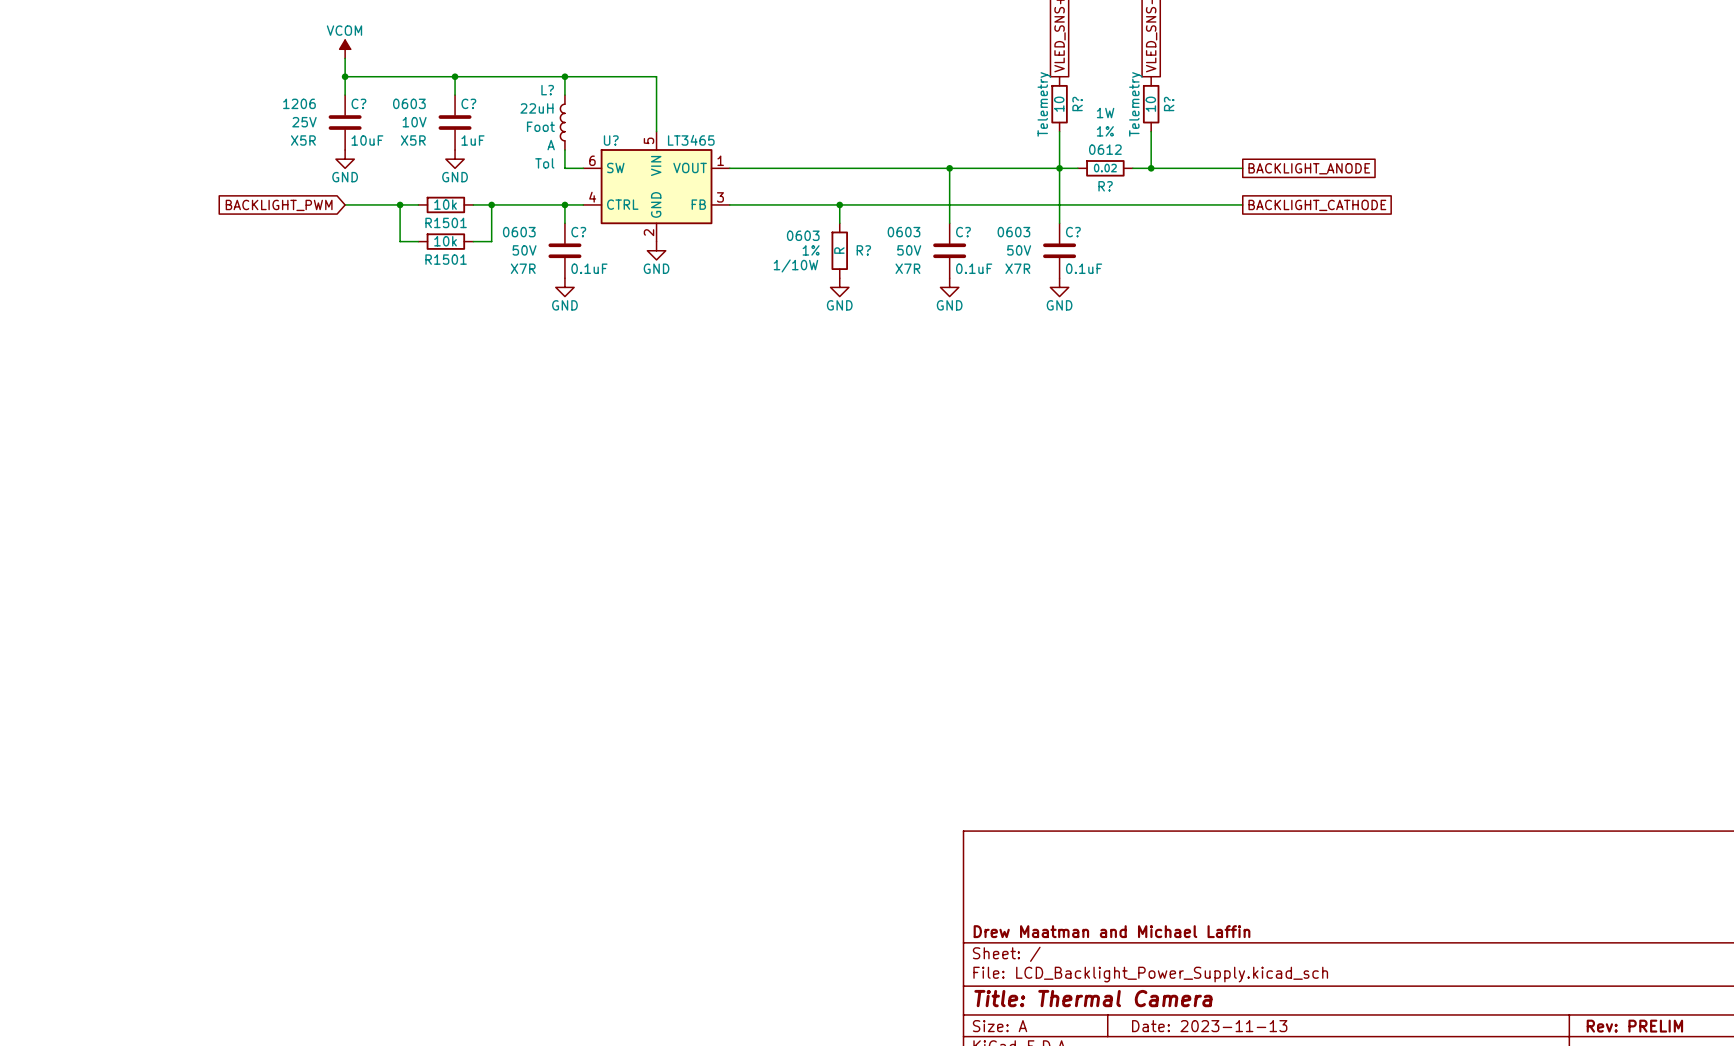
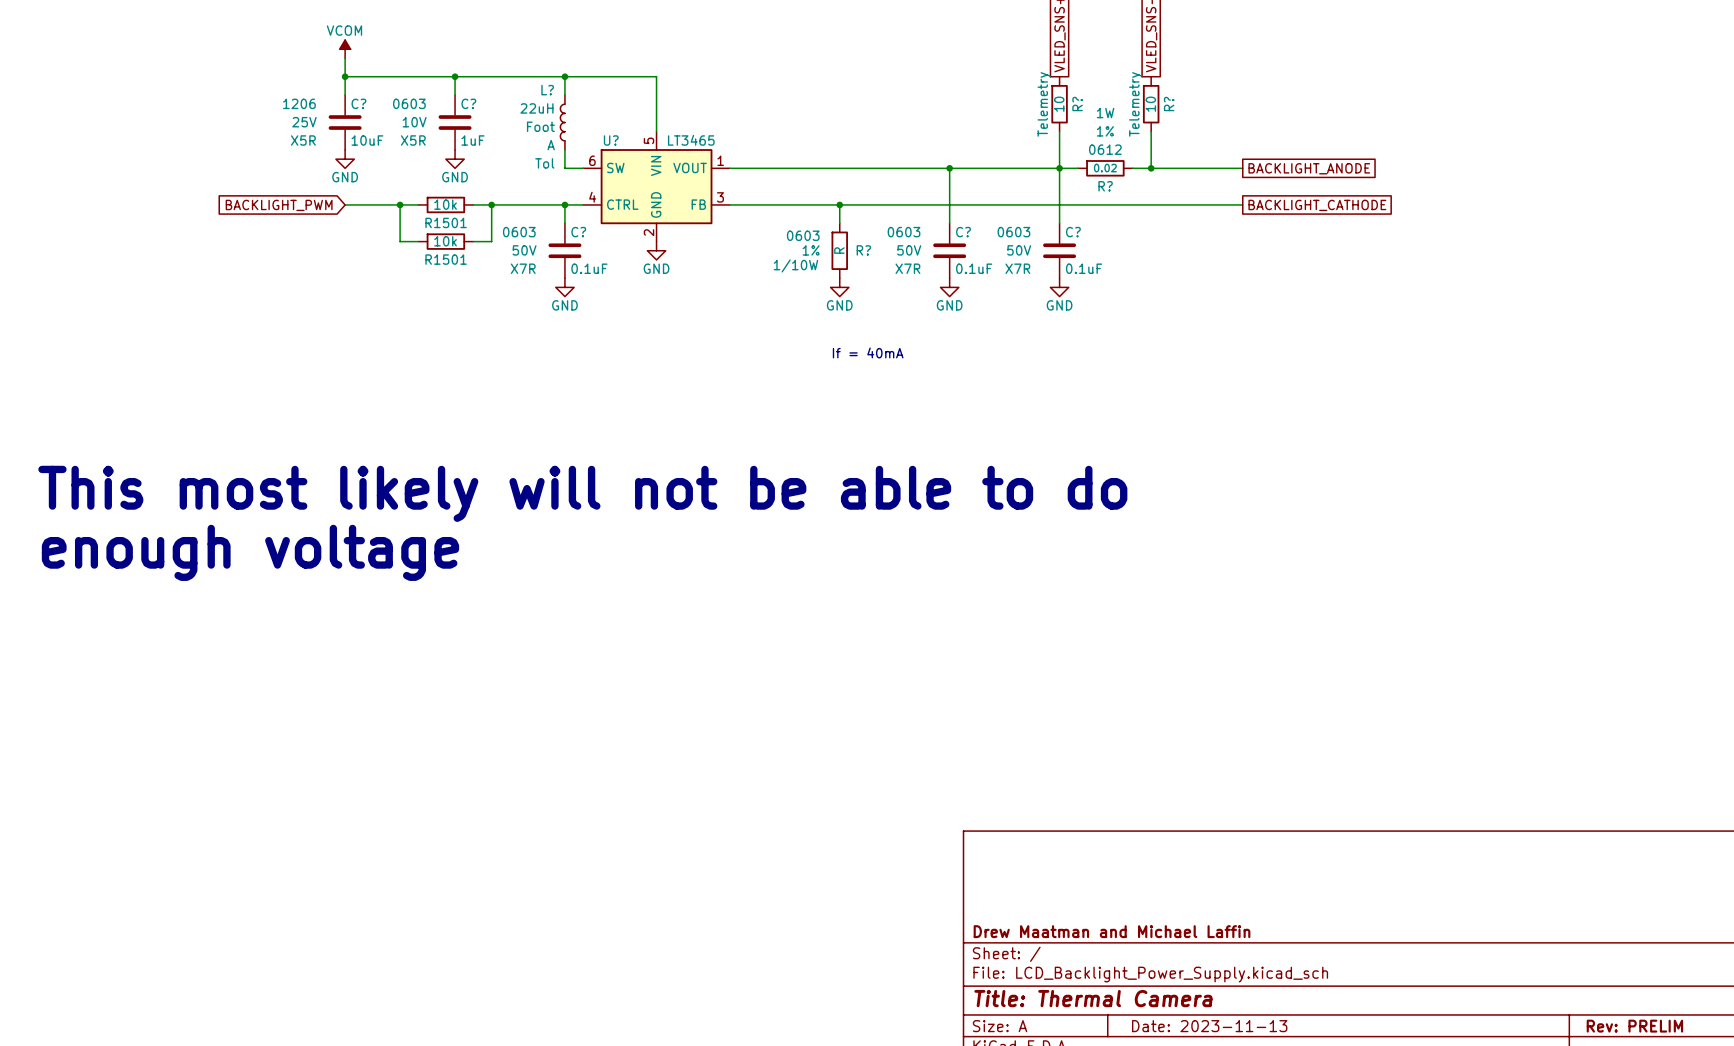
text: none -> If = 40mA (868, 352)
text: none -> This most likely will not be able to do (582, 493)
text: none -> enough voltage (250, 552)

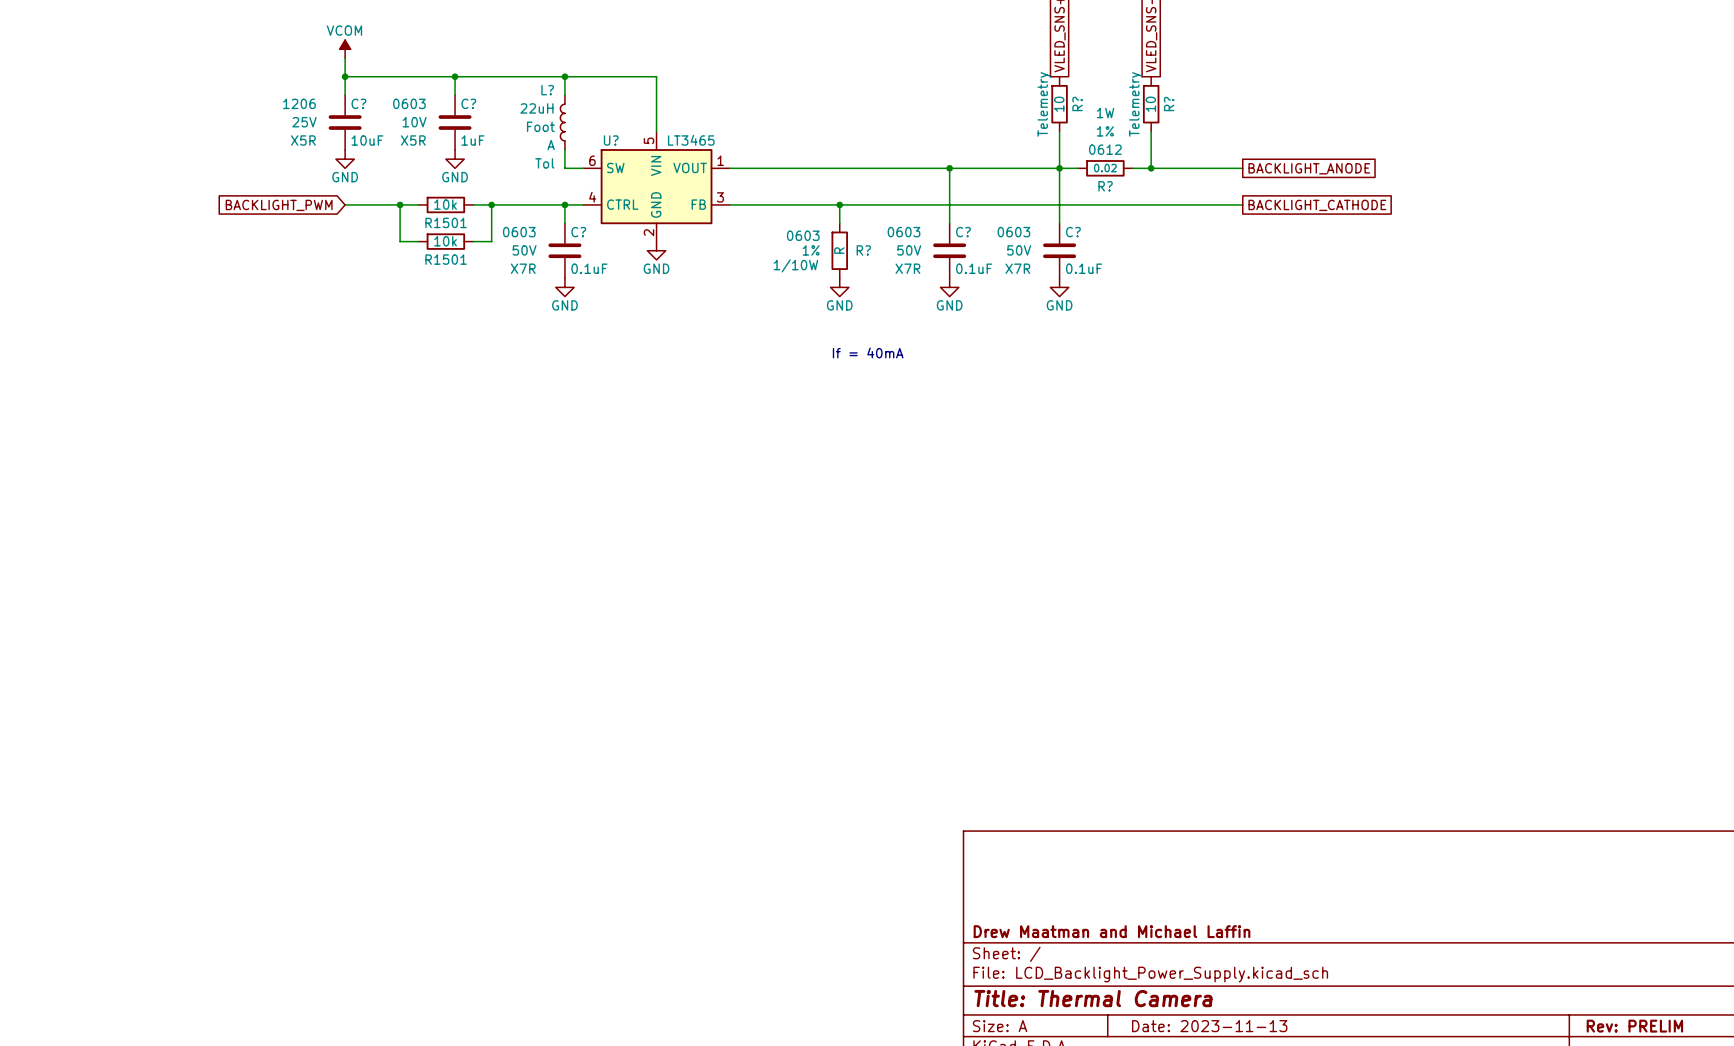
text: This most likely will not be able to do (582, 493) -> none
text: enough voltage (250, 552) -> none

